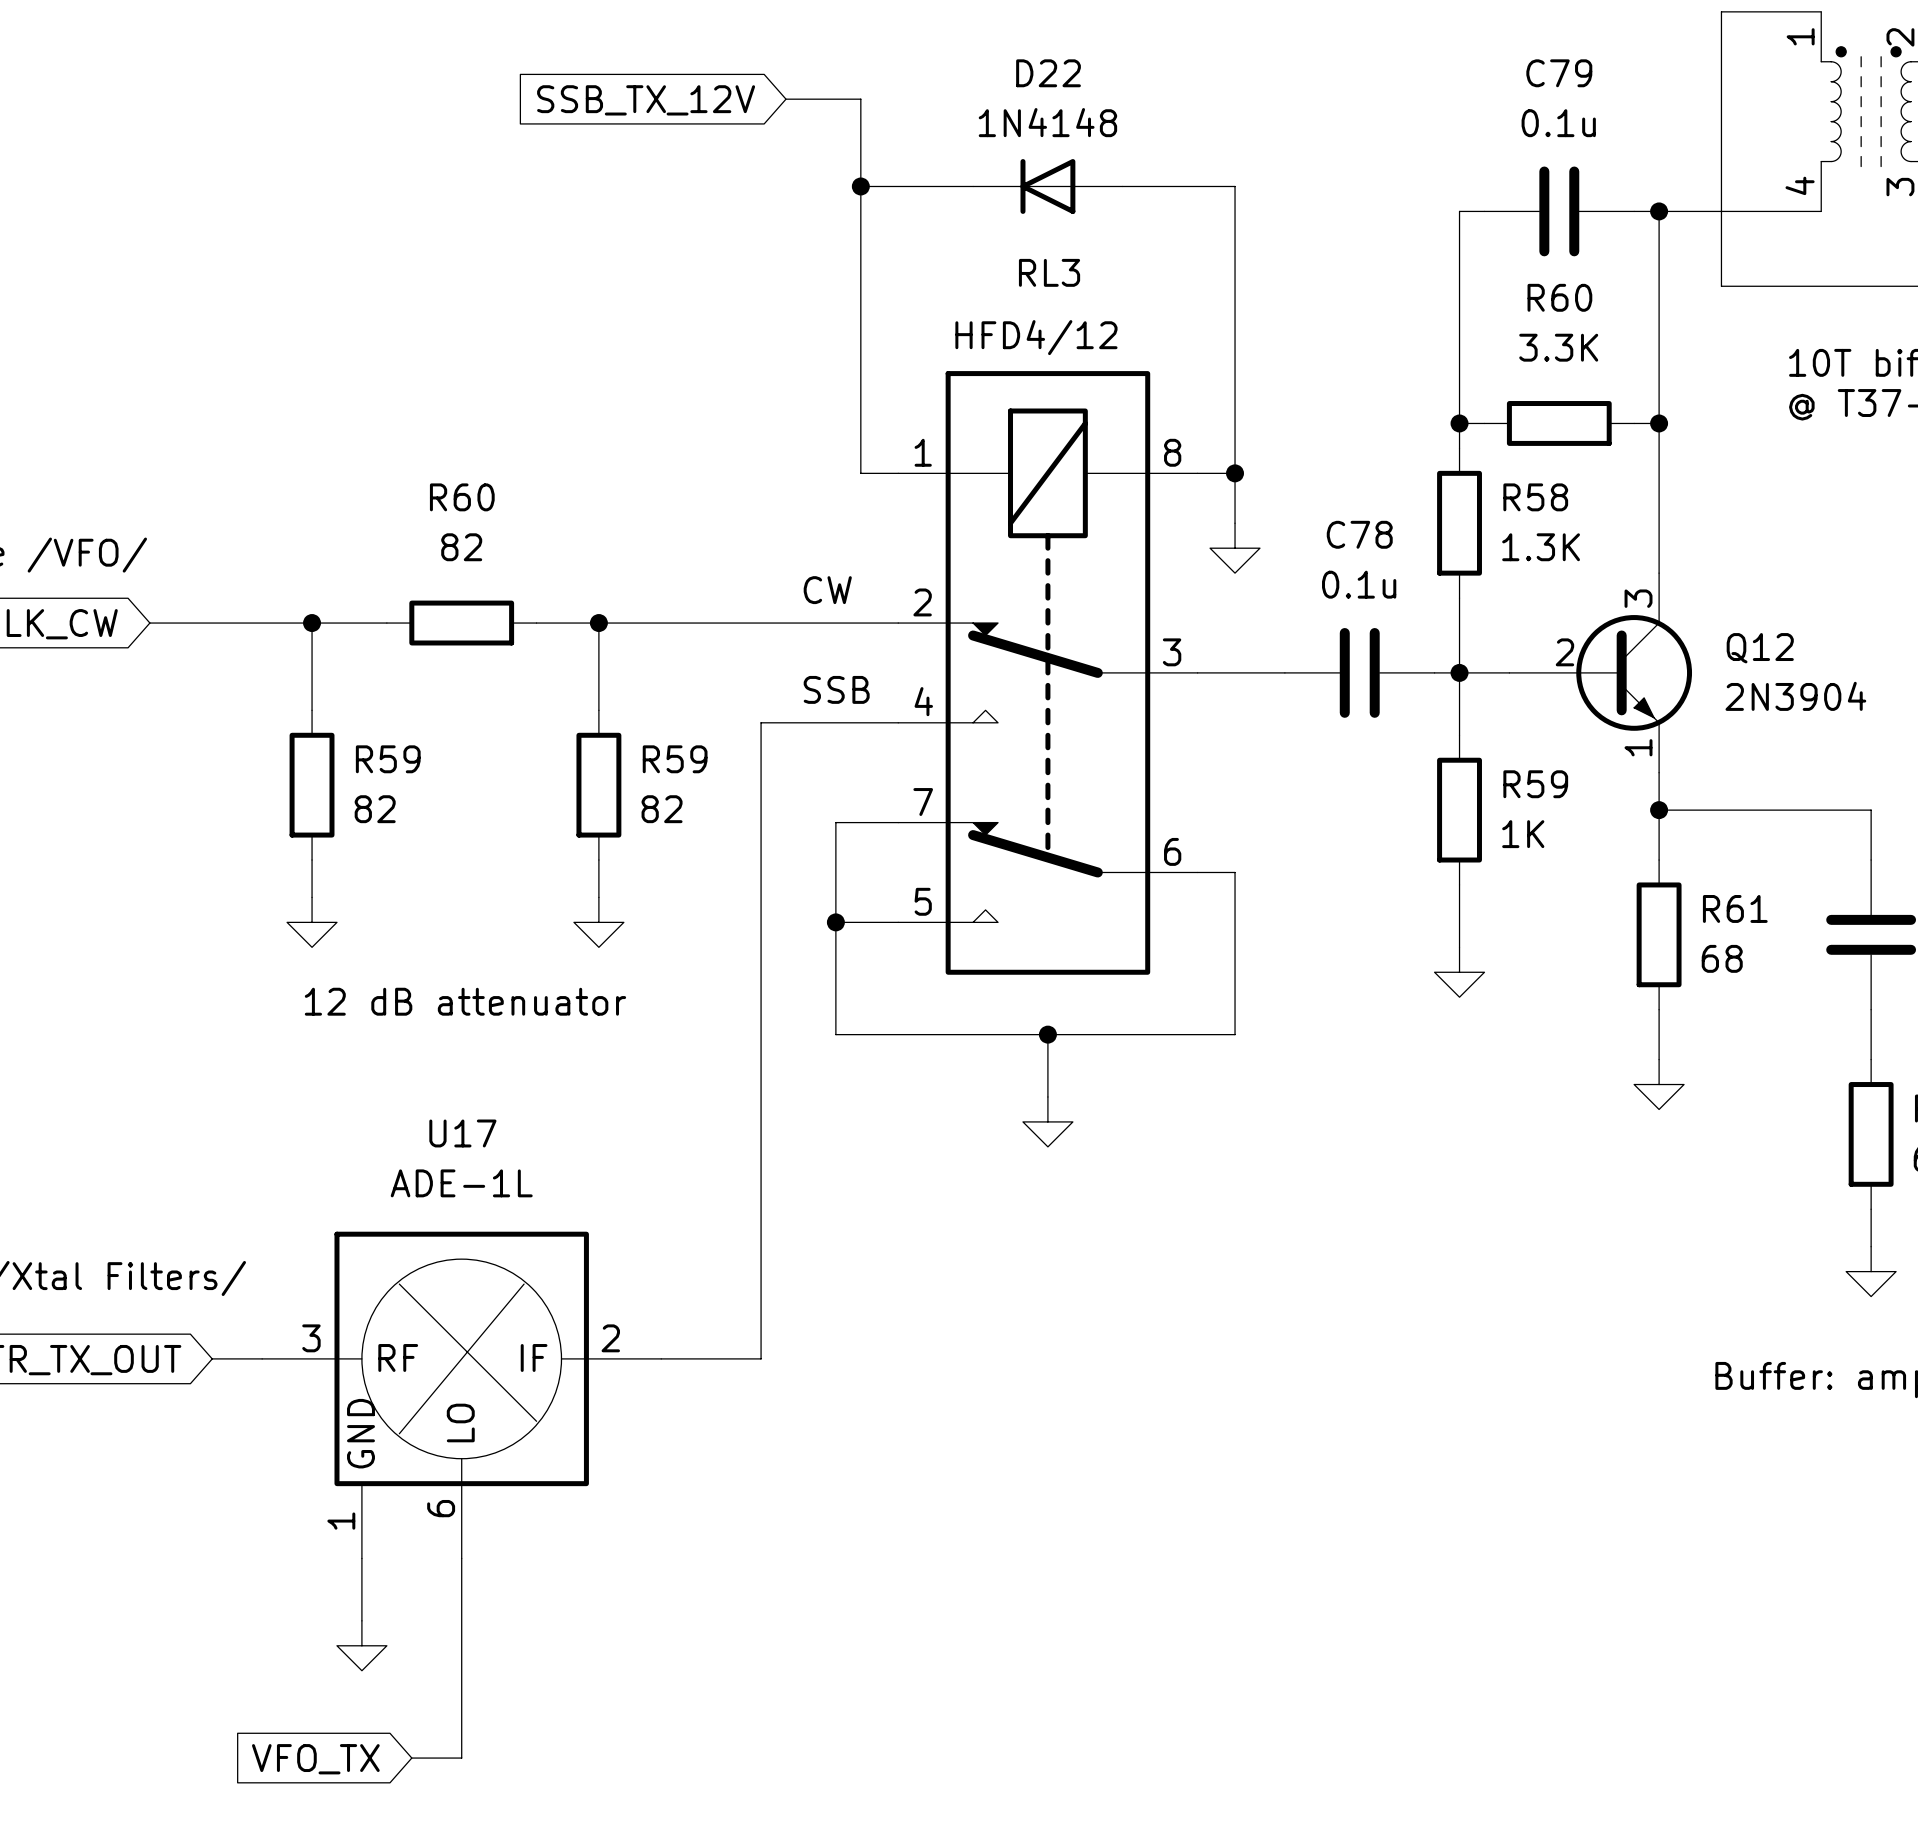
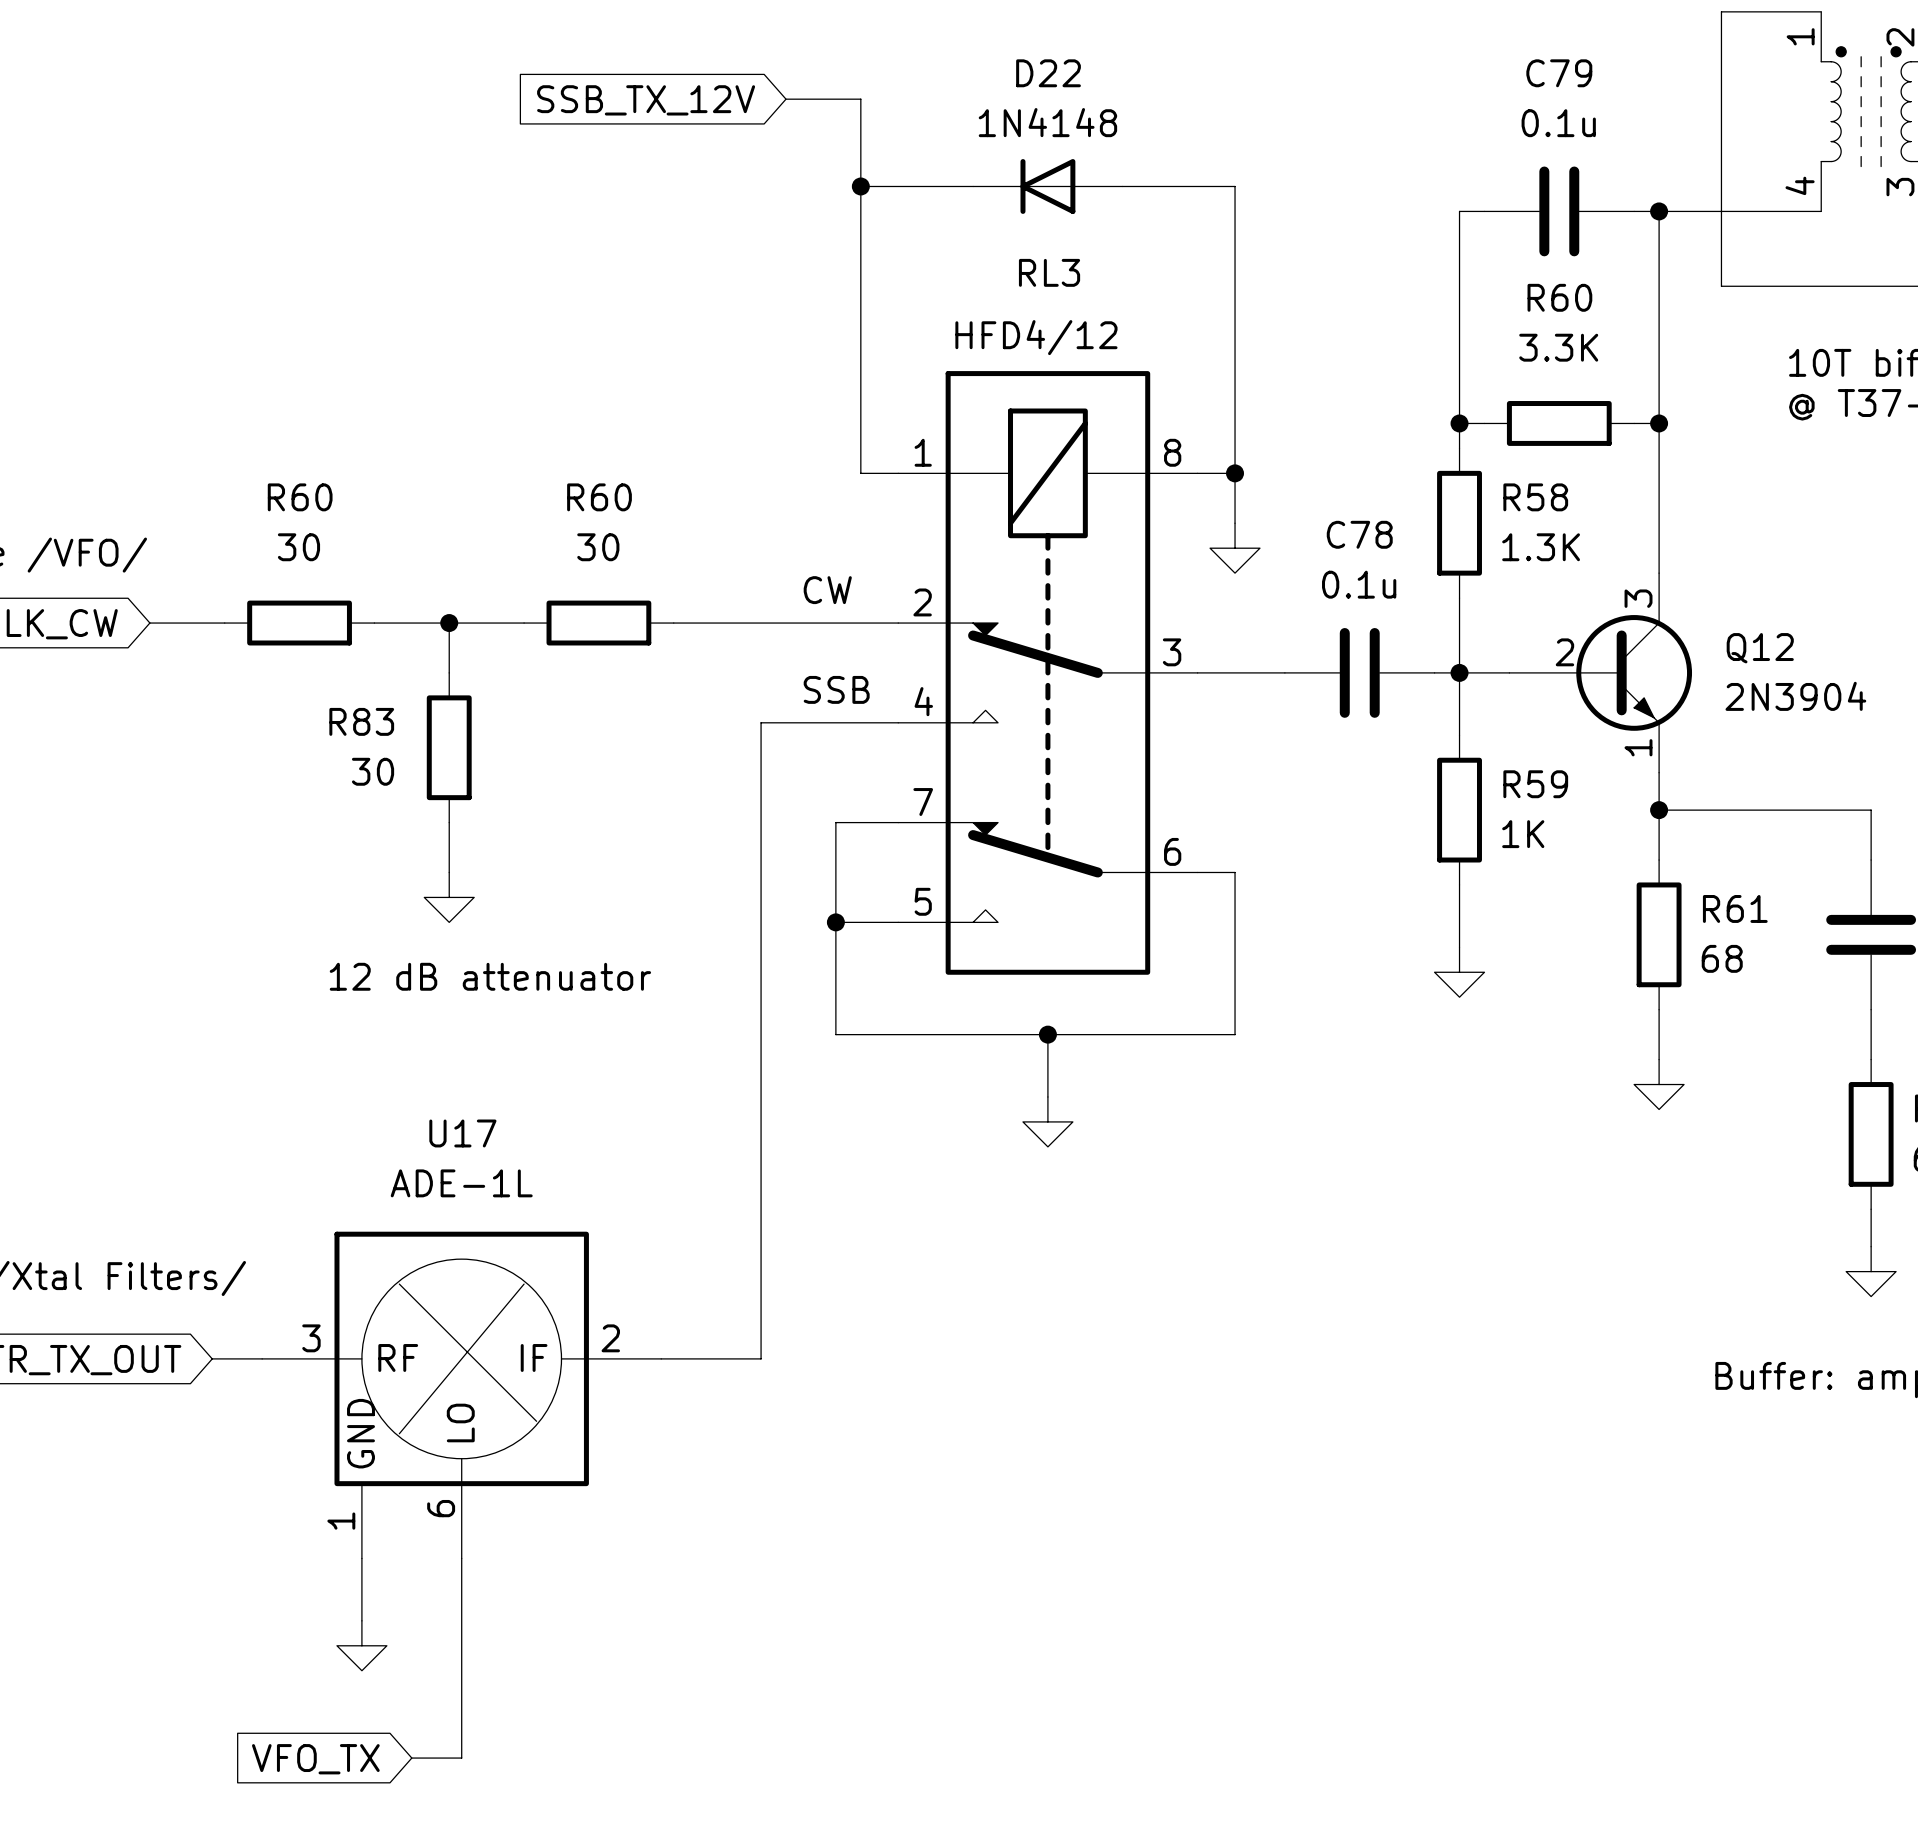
wire: (224, 623) (374, 623) -> none
R60: none -> 30 (299, 623)
wire: (312, 623) (312, 710) -> none
junction: (312, 623) -> none
wire: none -> (449, 623) (449, 672)
junction: none -> (449, 623)
R60: 82 (461, 623) -> none
wire: (536, 623) (673, 623) -> (386, 623) (524, 623)
wire: (598, 623) (598, 710) -> none
junction: (598, 623) -> none
R60: none -> 30 (598, 623)
R83: none -> 30 (449, 747)
R59: 82 (312, 785) -> none
R59: 82 (598, 785) -> none
wire: none -> (449, 822) (449, 872)
wire: (312, 860) (312, 897) -> none
wire: (598, 860) (598, 897) -> none
power symbol: none -> (449, 897)
power symbol: (312, 922) -> none
power symbol: (598, 922) -> none
text position: 12 dB attenuator (465, 1001) -> 12 dB attenuator (490, 976)

